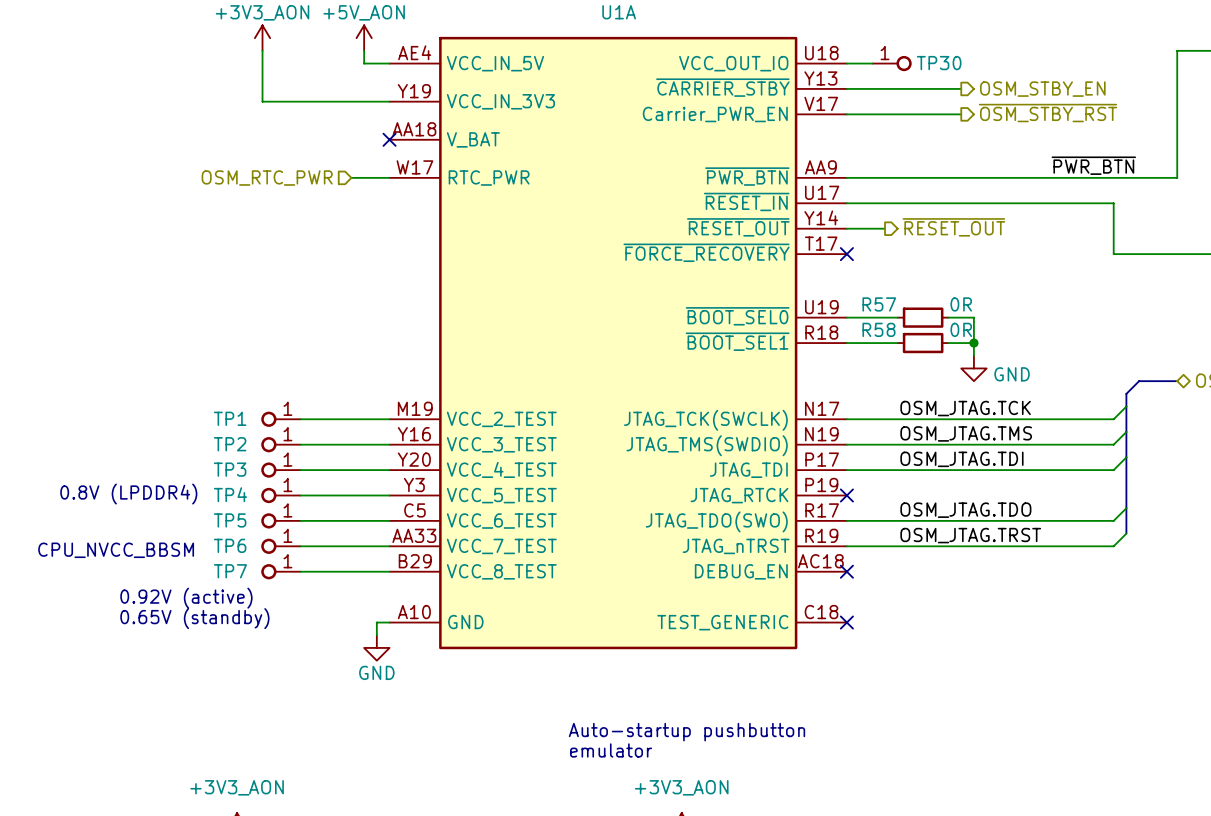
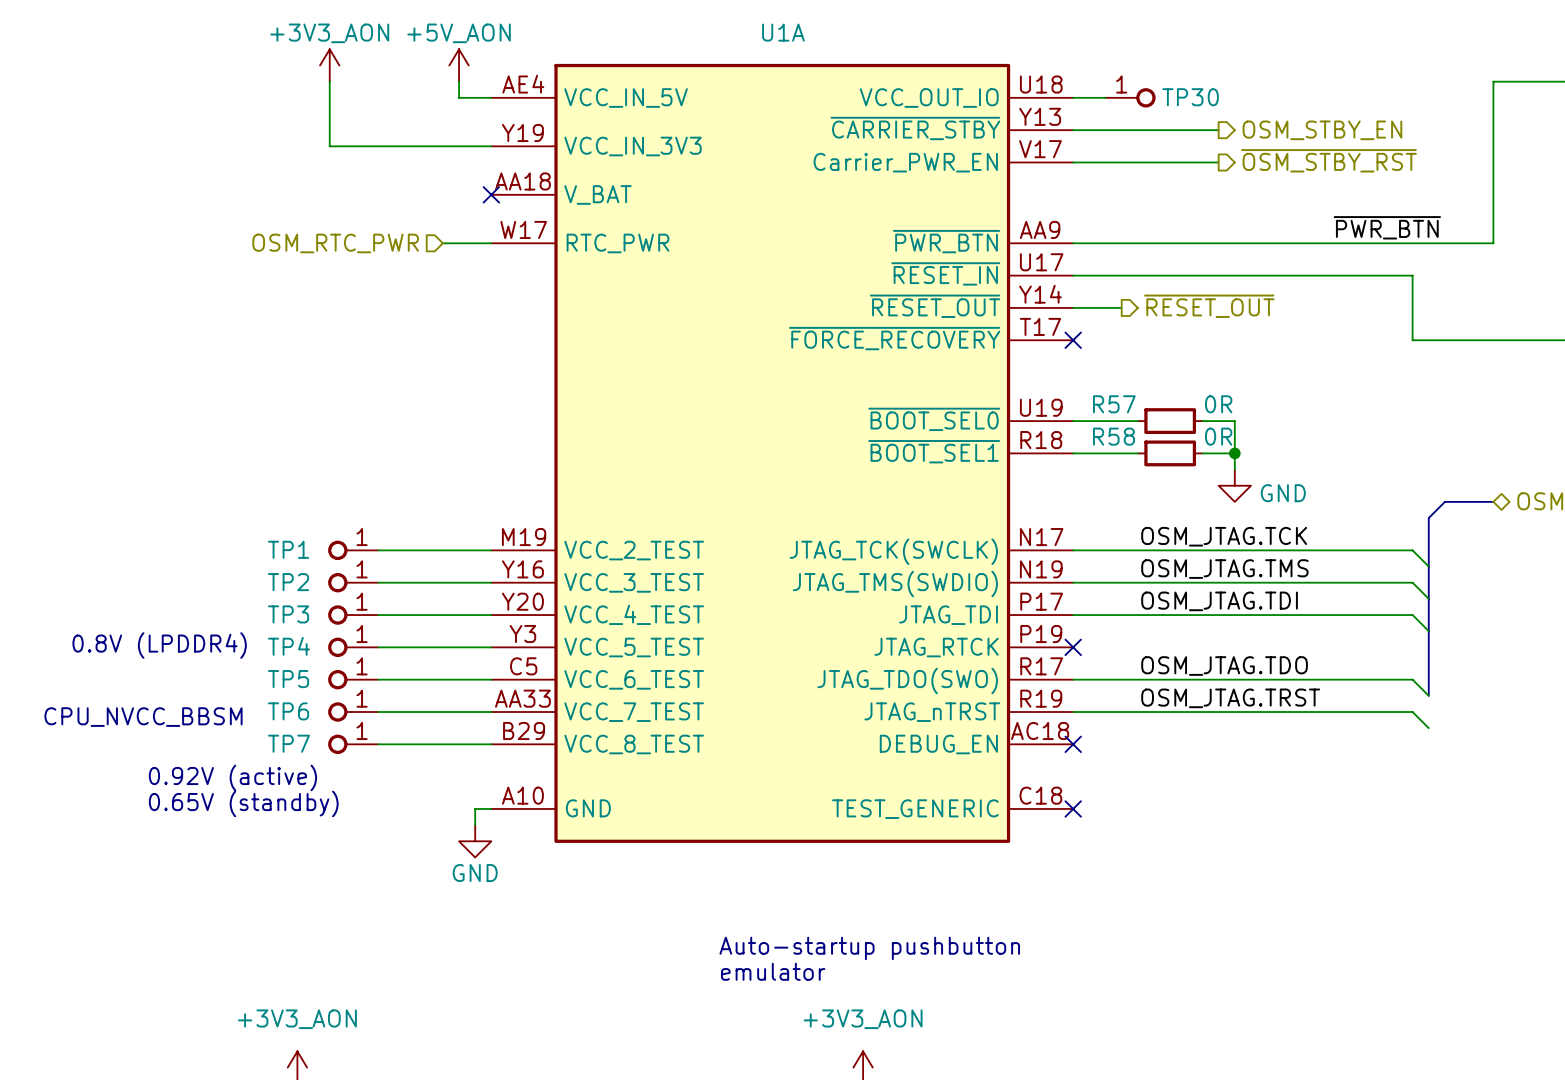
wire: (1126, 406) (1113, 419) -> none
wire: (1126, 431) (1113, 444) -> (1428, 566) (1412, 550)
wire: (1126, 457) (1113, 470) -> (1428, 598) (1412, 582)
wire: none -> (1412, 615) (1428, 631)
wire: (1126, 508) (1113, 520) -> none
wire: (1126, 533) (1113, 546) -> (1428, 695) (1412, 679)
wire: none -> (1412, 712) (1428, 728)

